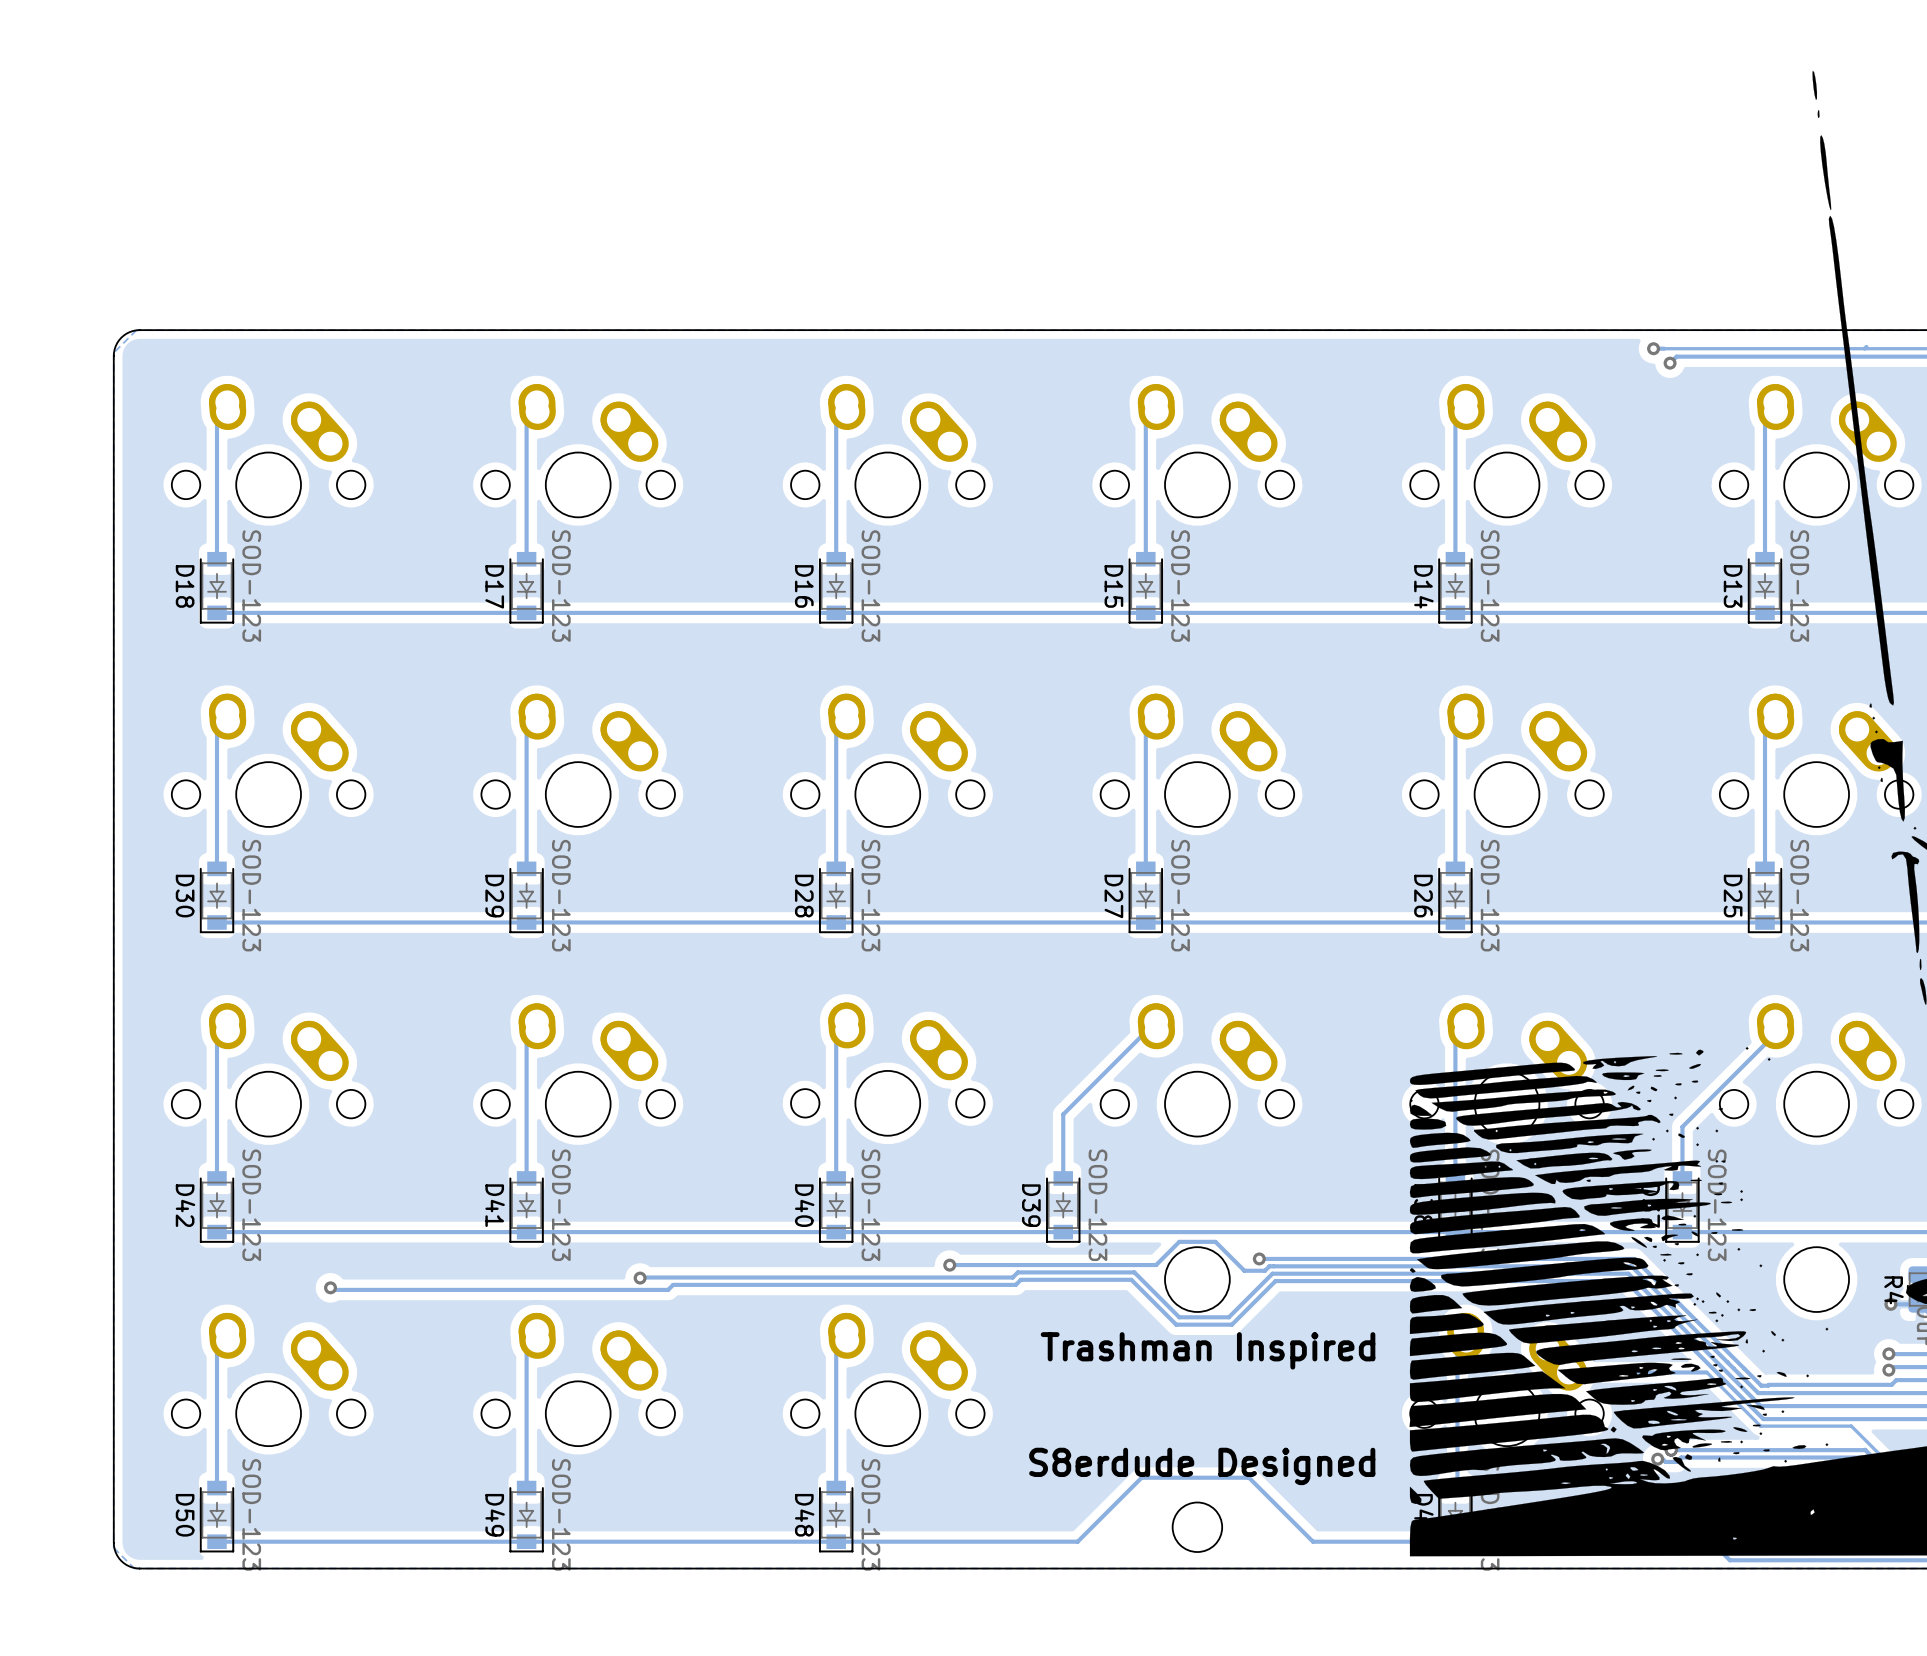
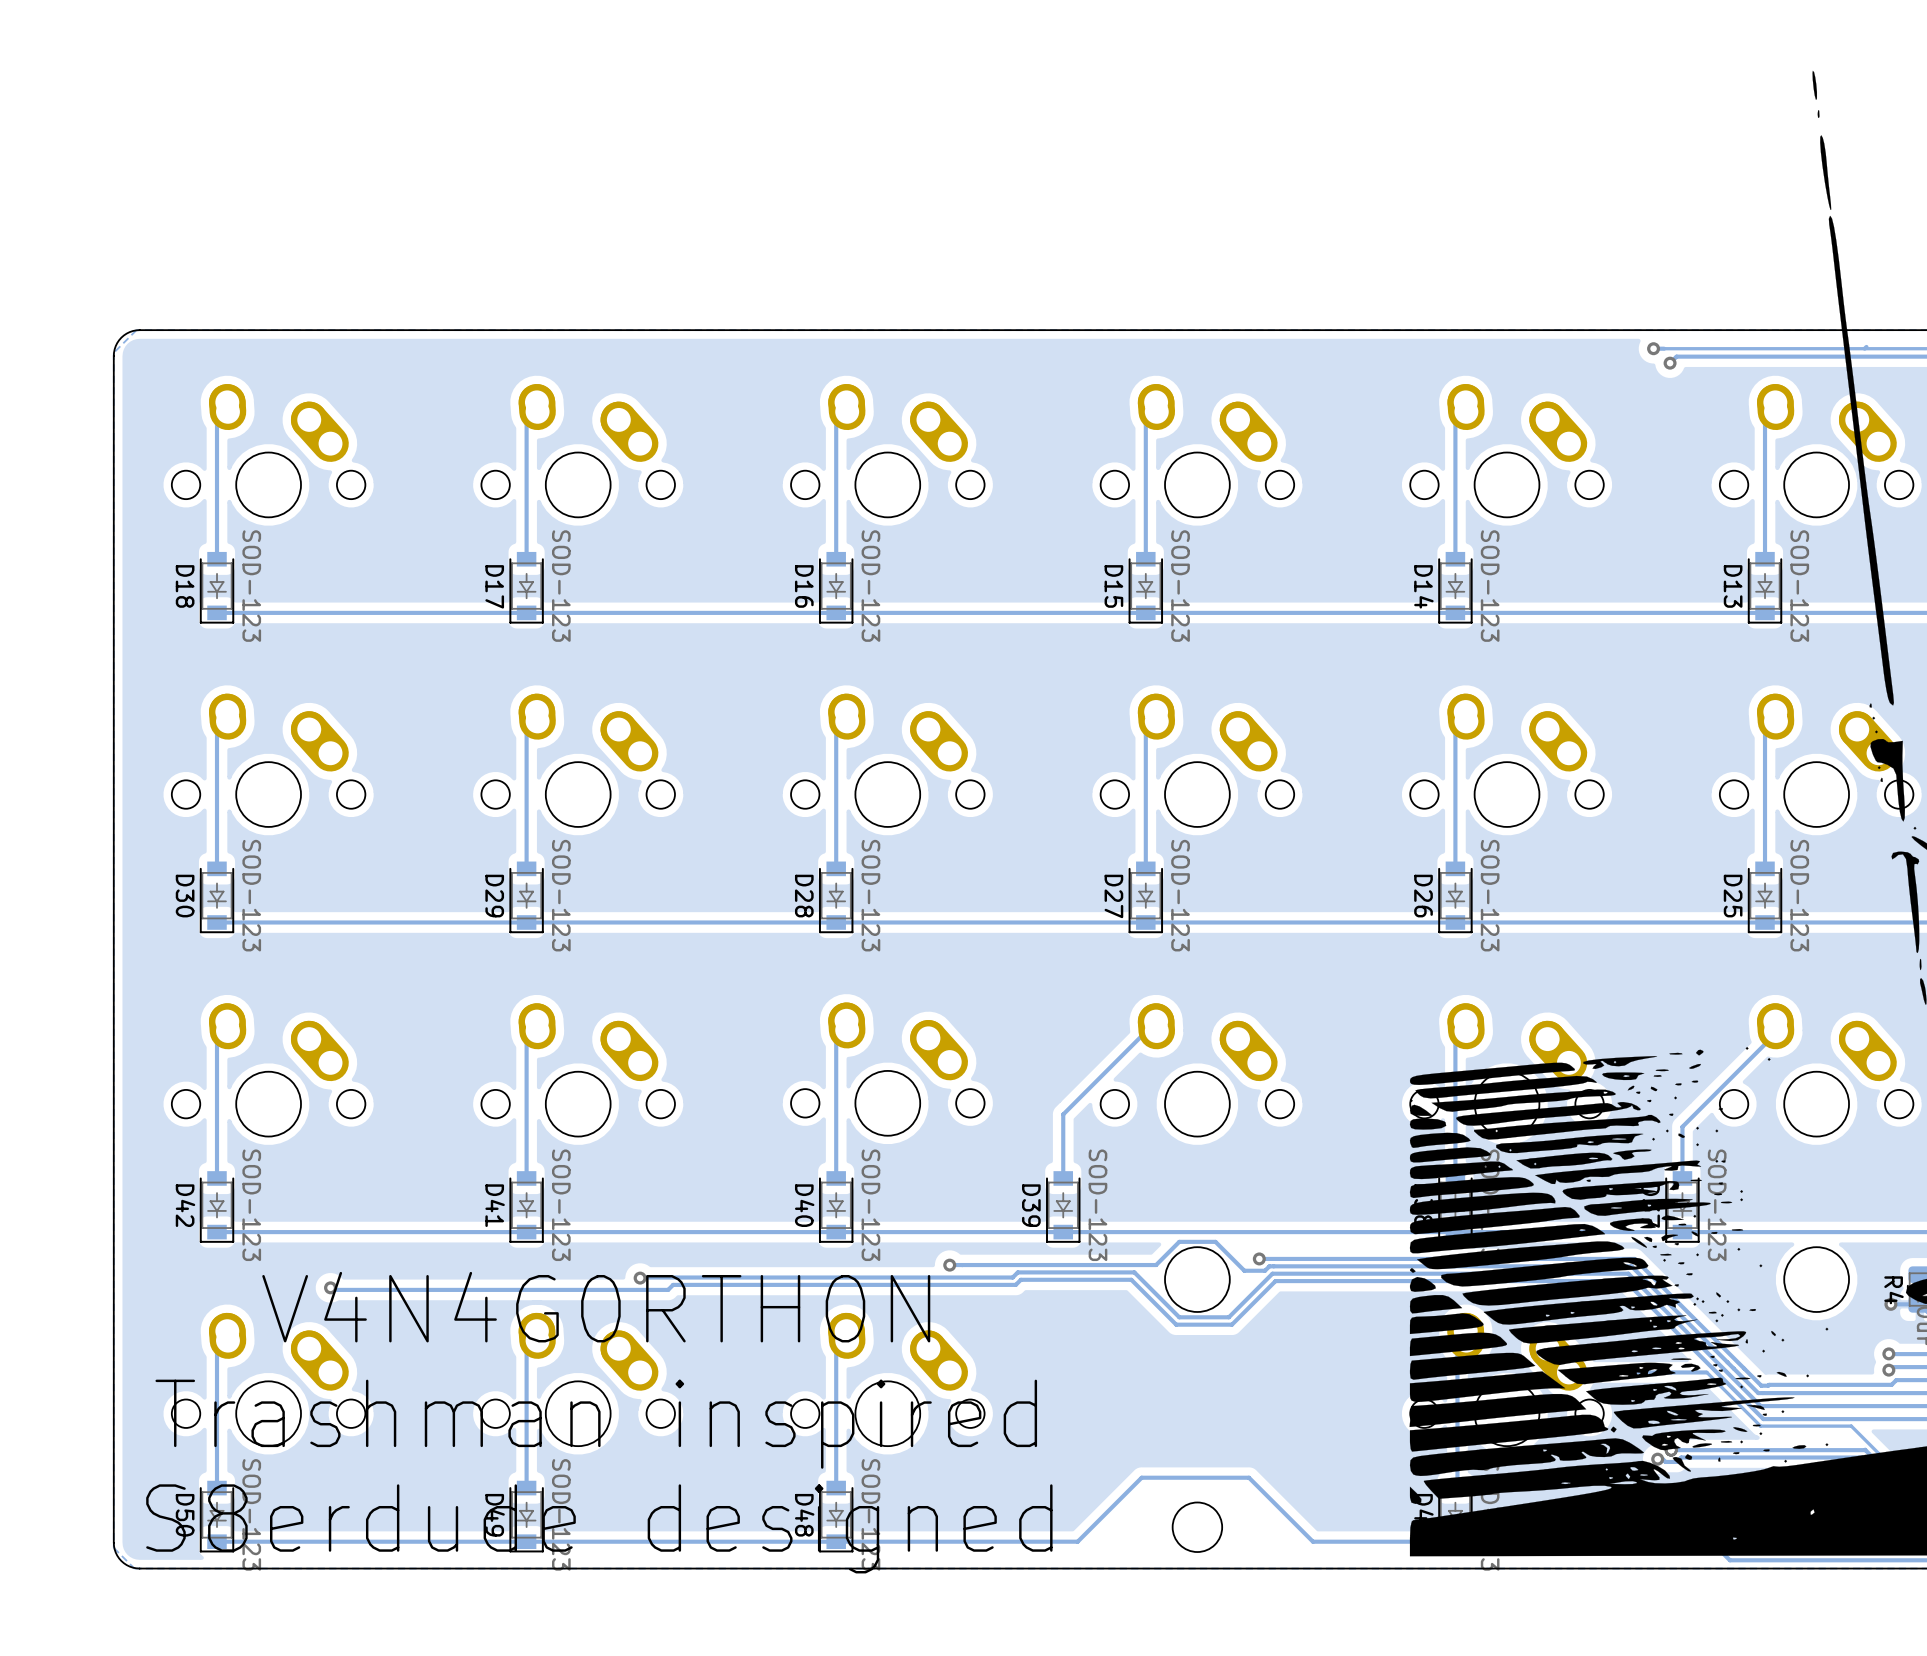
text: none -> V4N4G0RTH0N (596, 1307)
text: Trashman Inspired (1208, 1350) -> none
text: none -> Trashman inspired (596, 1424)
text: S8erdude Designed (1202, 1466) -> none
text: none -> S8erdude designed (599, 1528)

